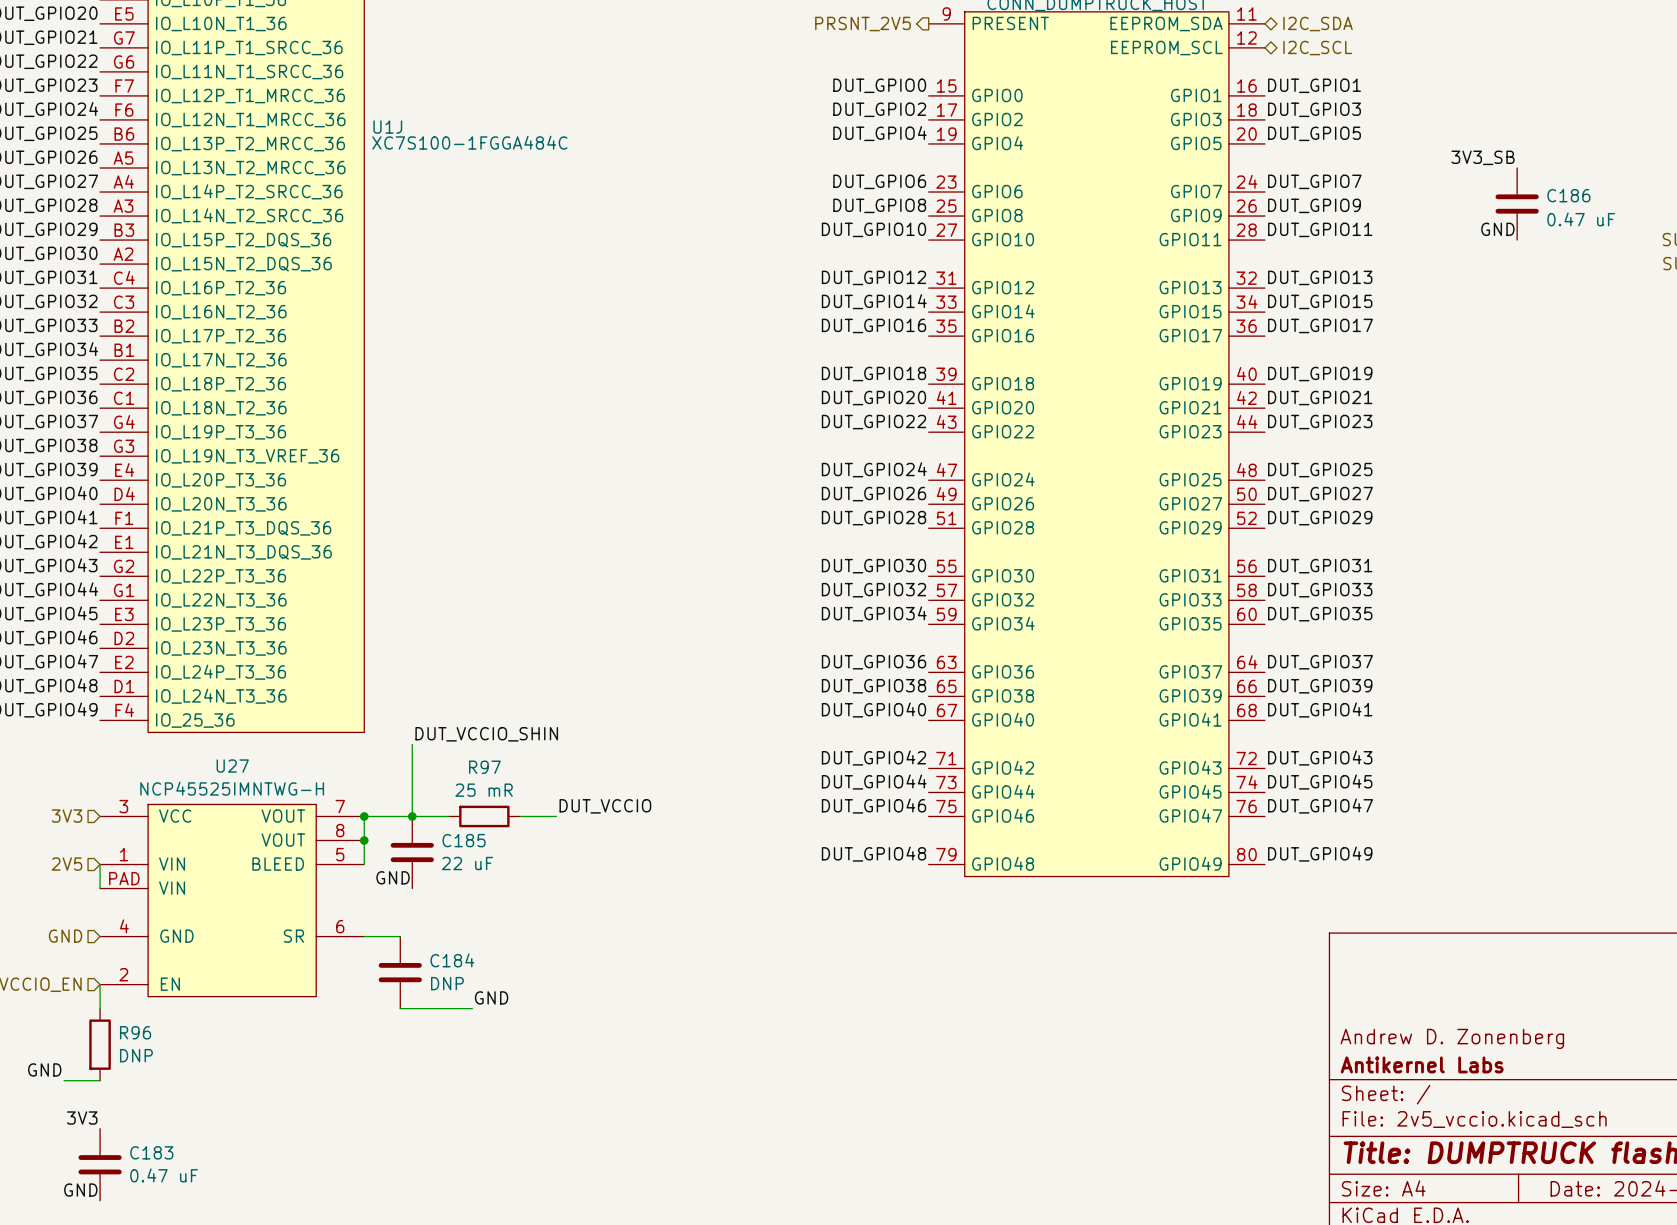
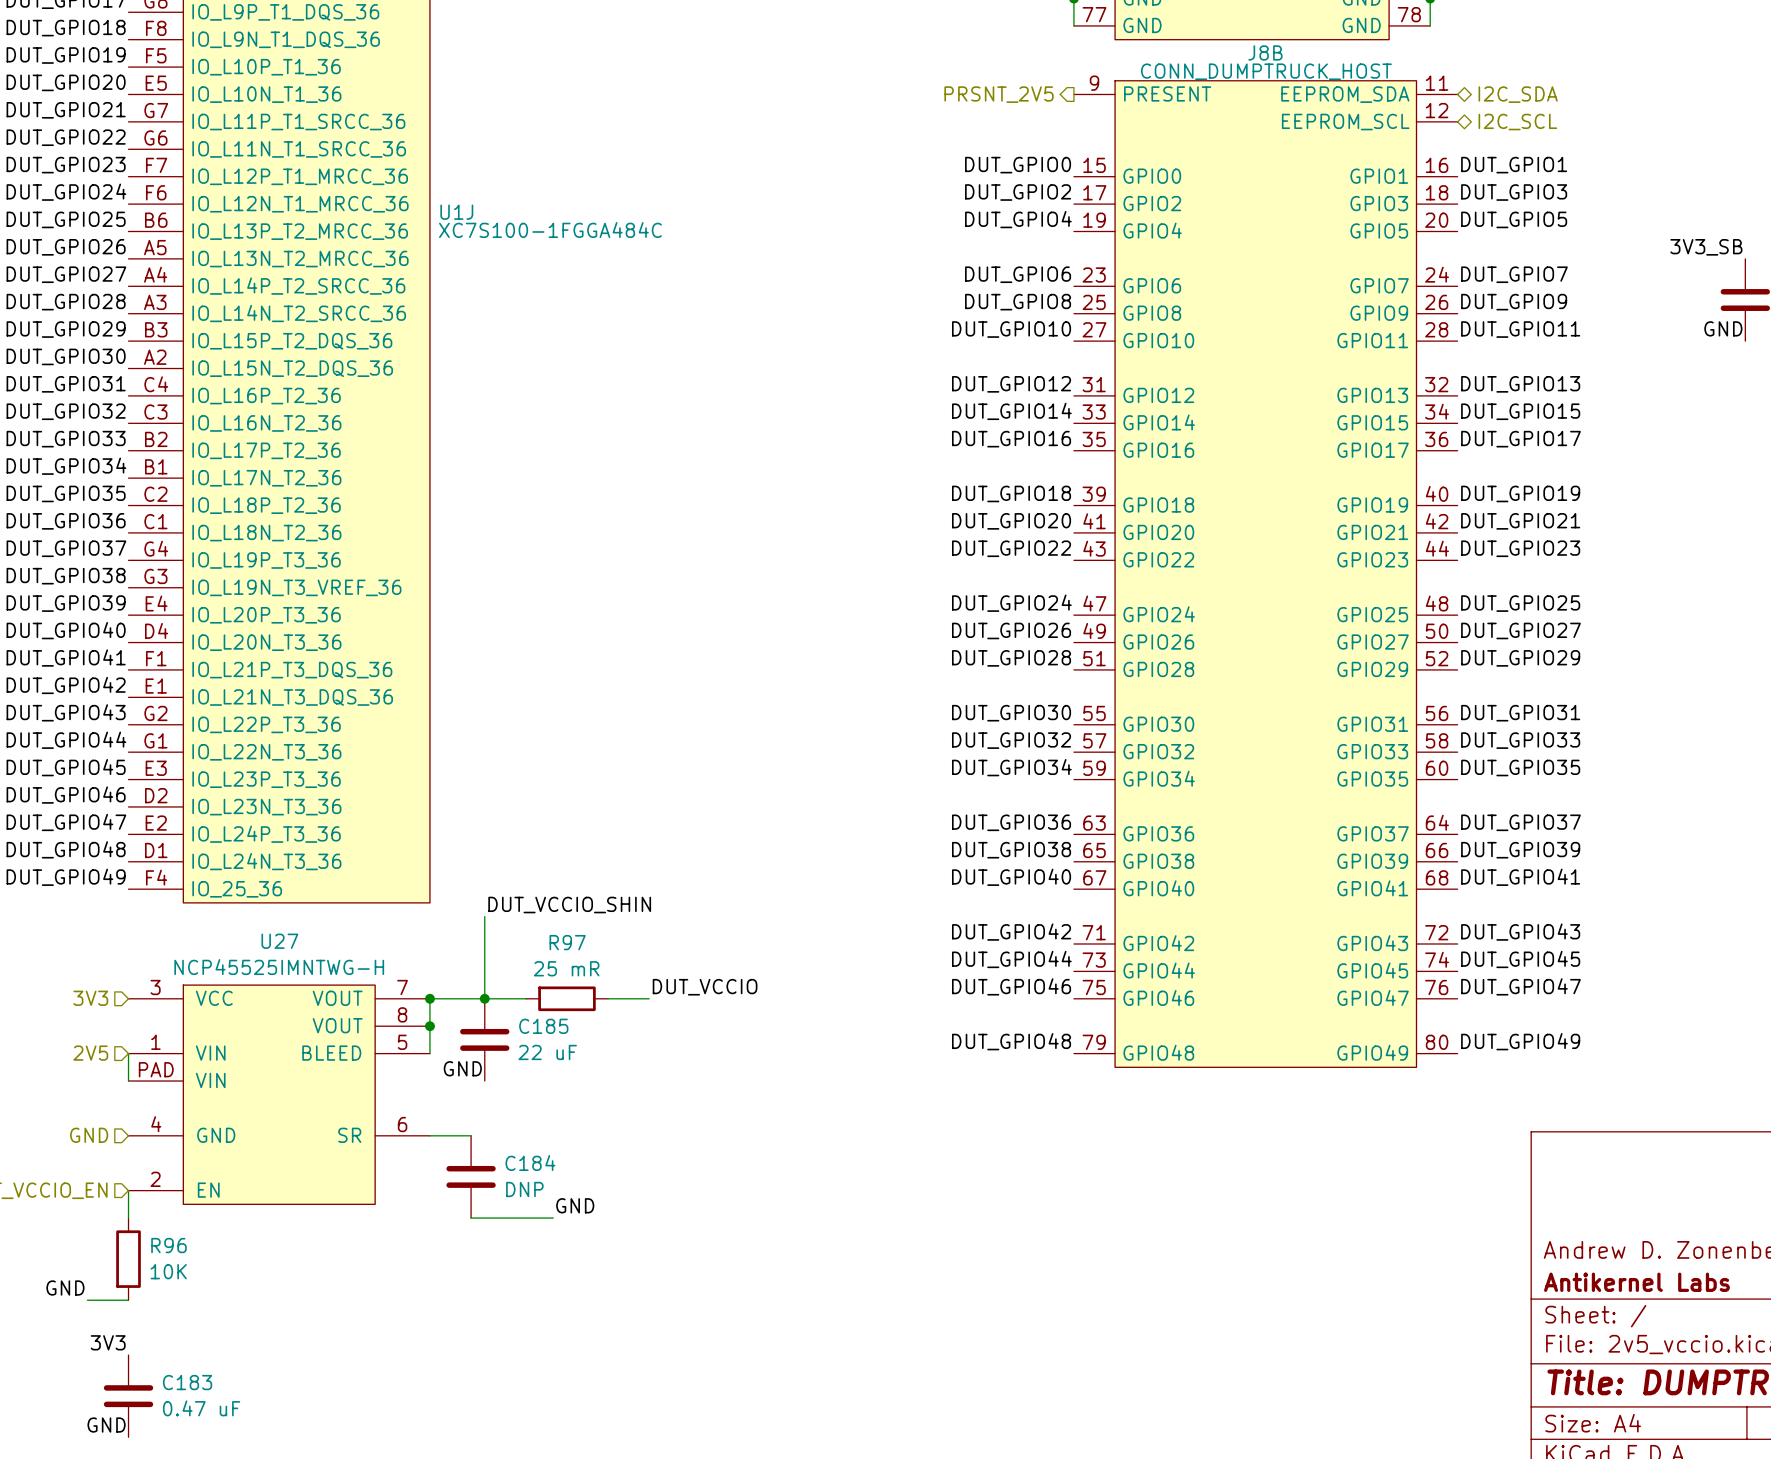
R96 value: DNP (136, 1055) -> 10K (168, 1271)

